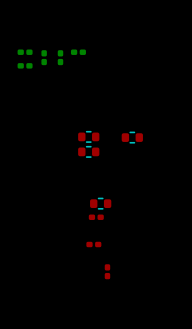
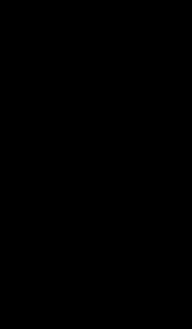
part: (25, 52) -> none
part: (78, 52) -> none
part: (44, 57) -> none
part: (60, 57) -> none
part: (25, 65) -> none
part: (88, 136) -> none
part: (132, 137) -> none
part: (88, 151) -> none
part: (100, 203) -> none
part: (96, 217) -> none
part: (93, 244) -> none
part: (107, 271) -> none

